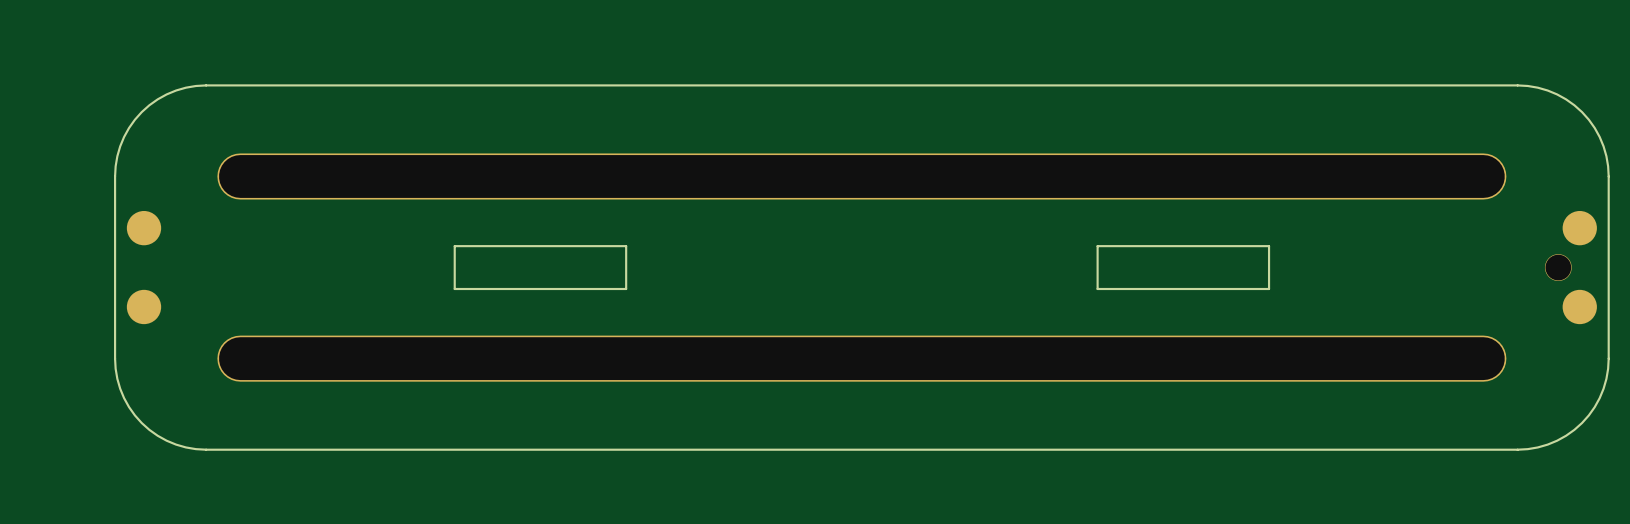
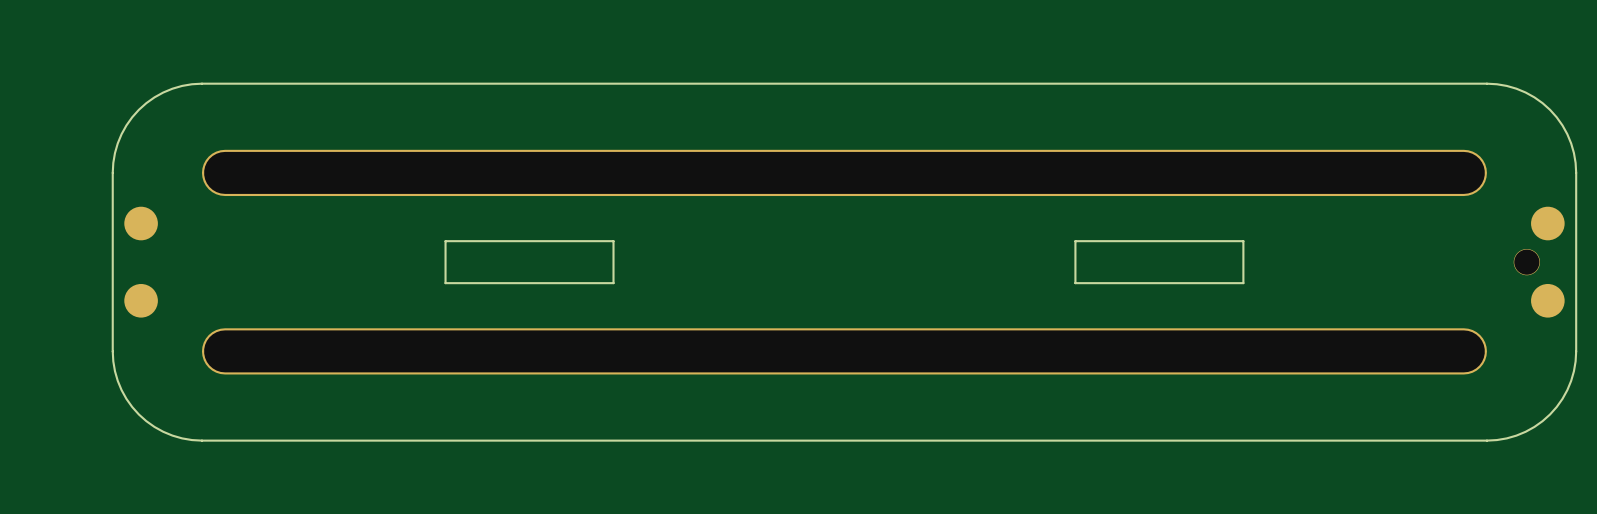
part footprint: [217, 153, 1507, 200] -> [201, 149, 1487, 197]
part footprint: [217, 335, 1507, 382] -> [201, 328, 1487, 375]

